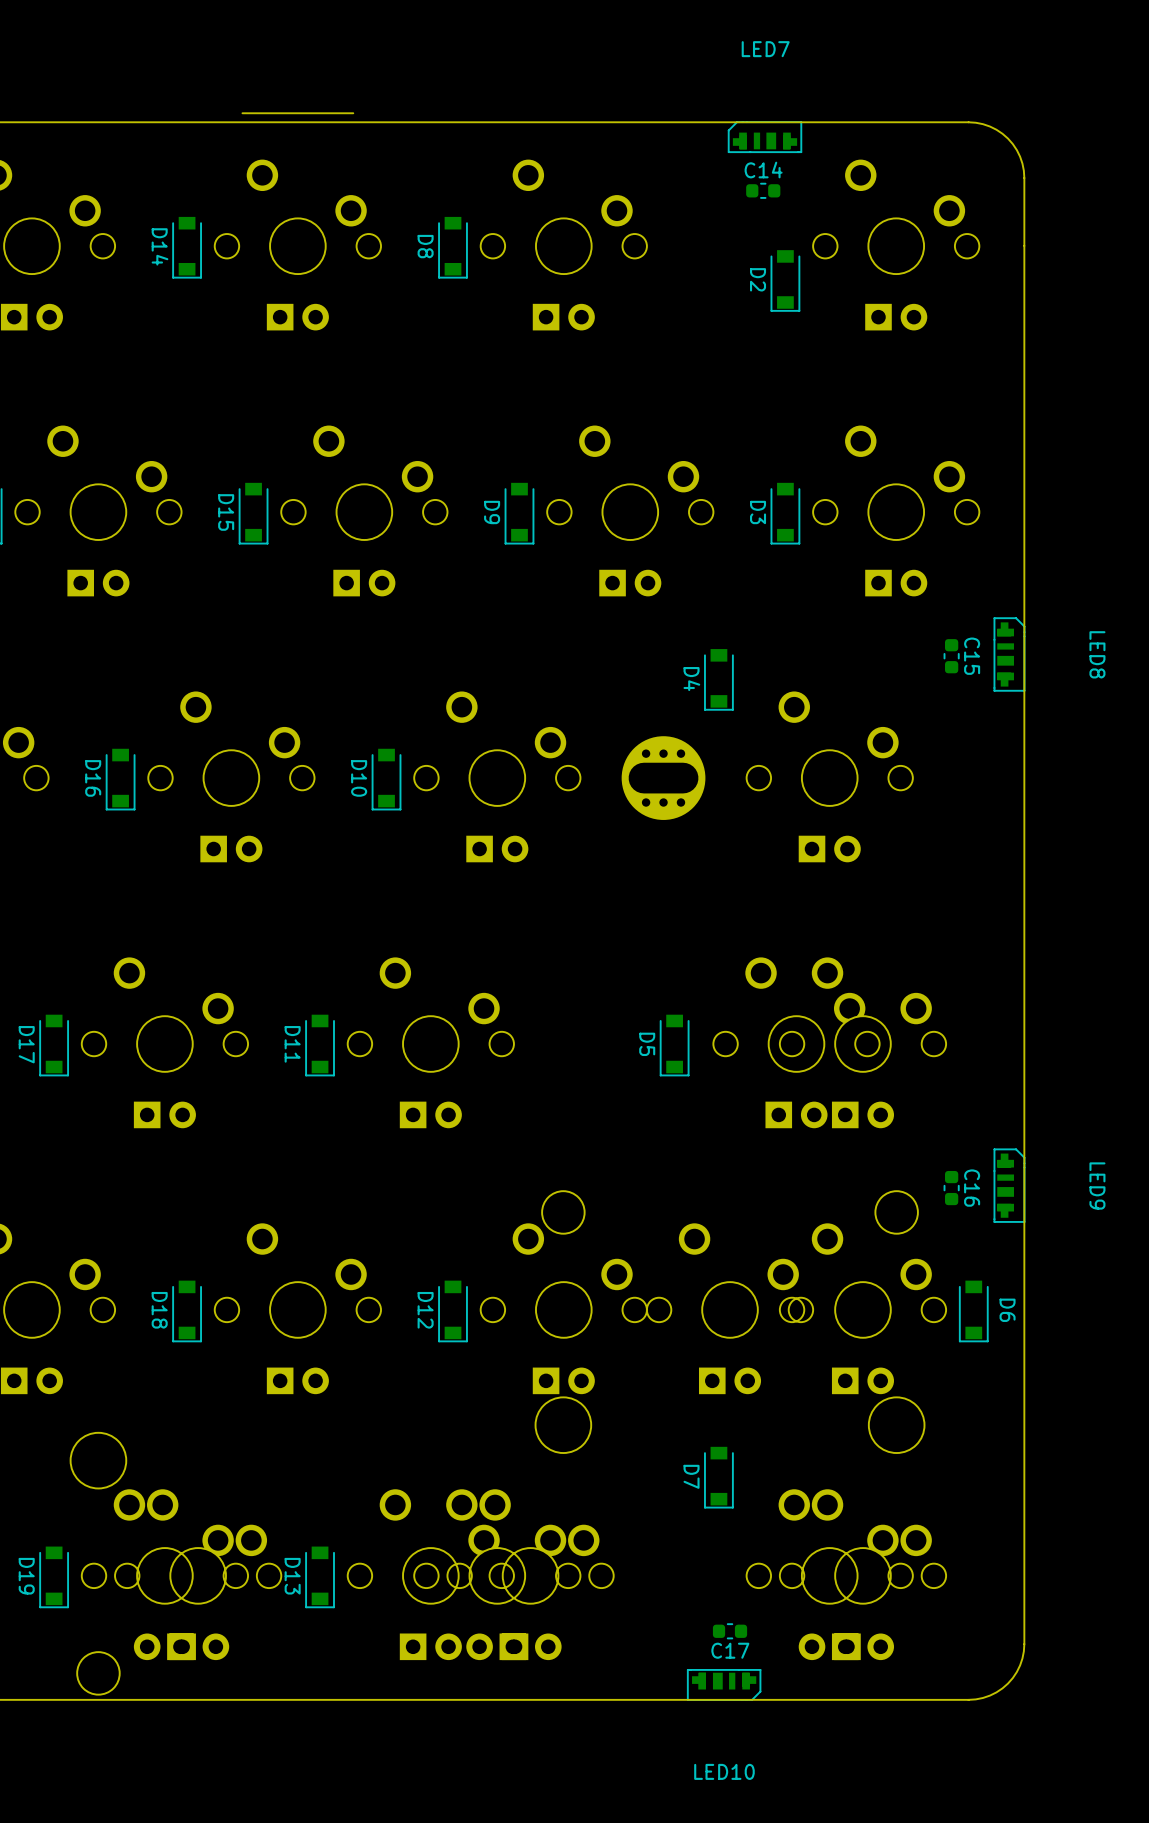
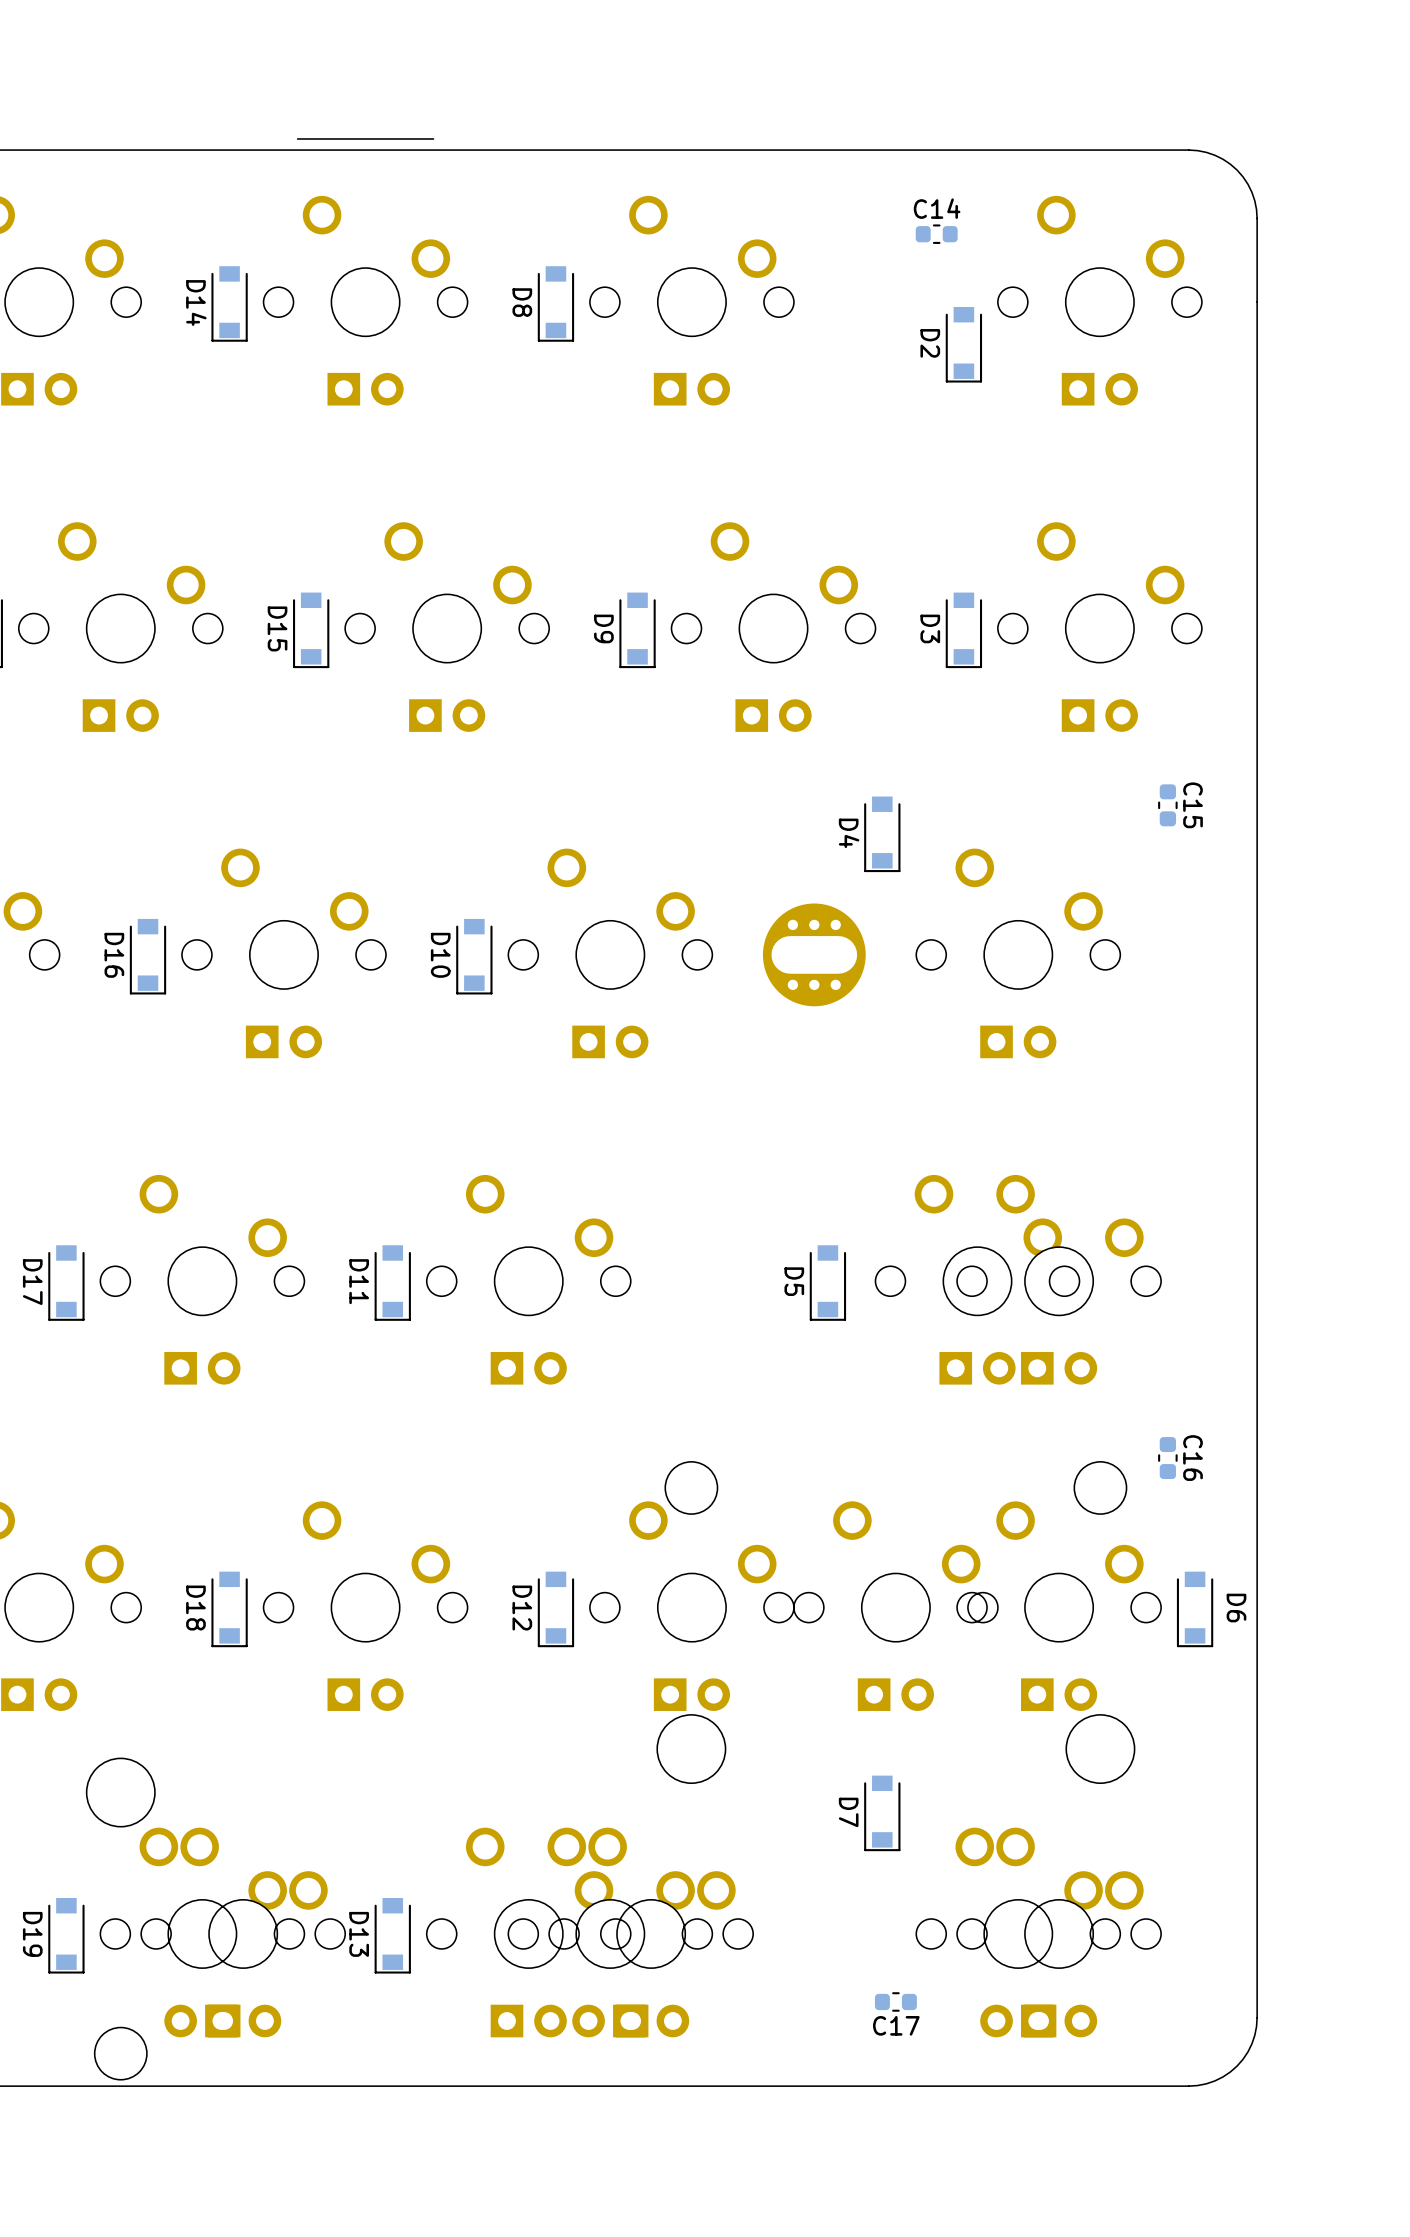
LED7: (764, 137) -> none
LED8: (1009, 654) -> none
LED9: (1009, 1185) -> none
LED10: (724, 1684) -> none

